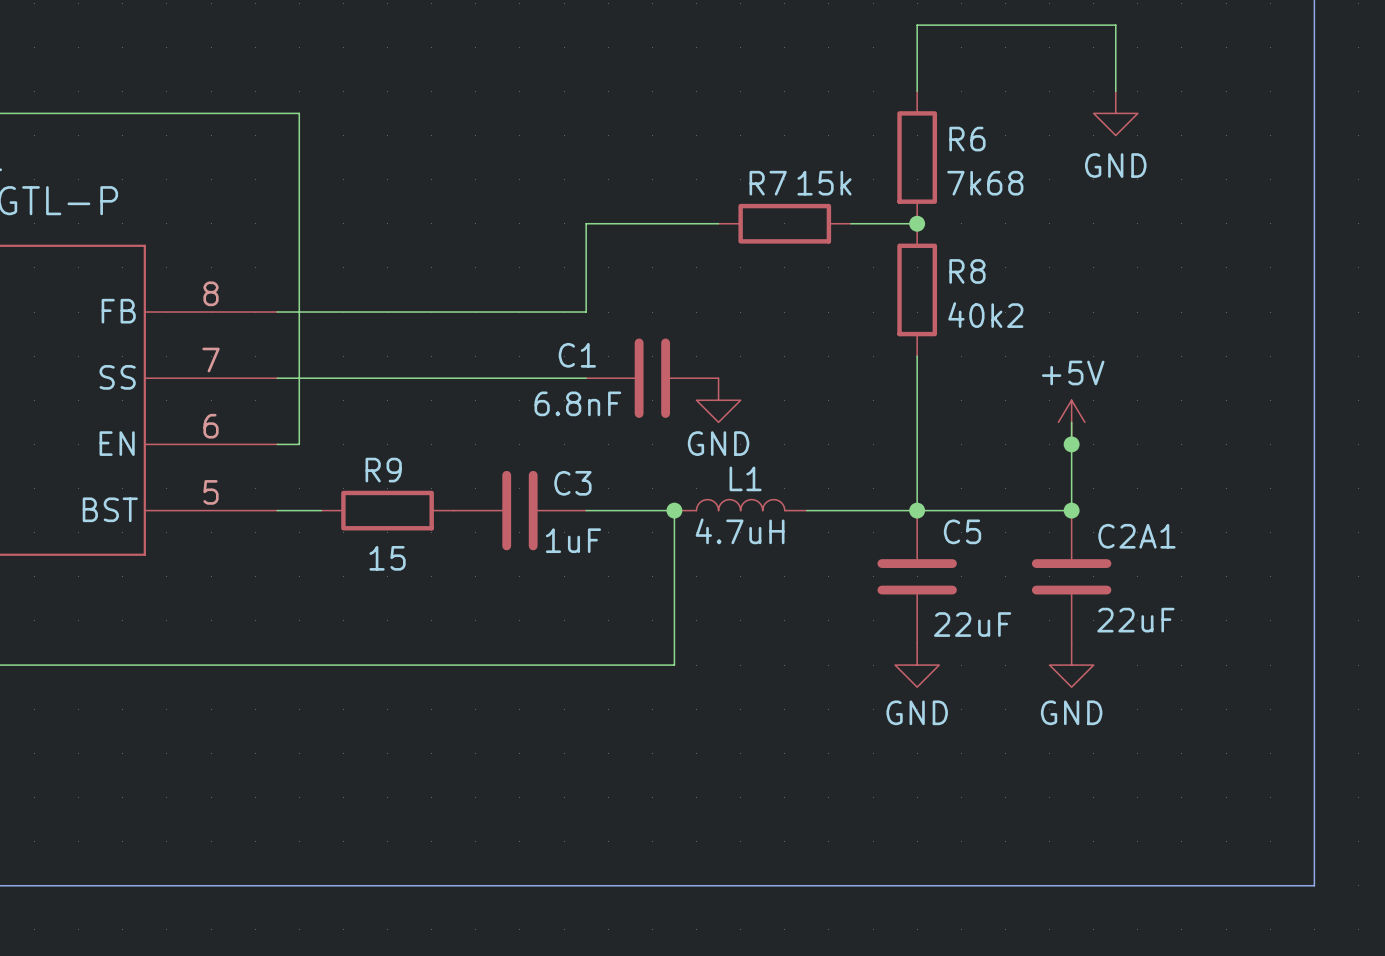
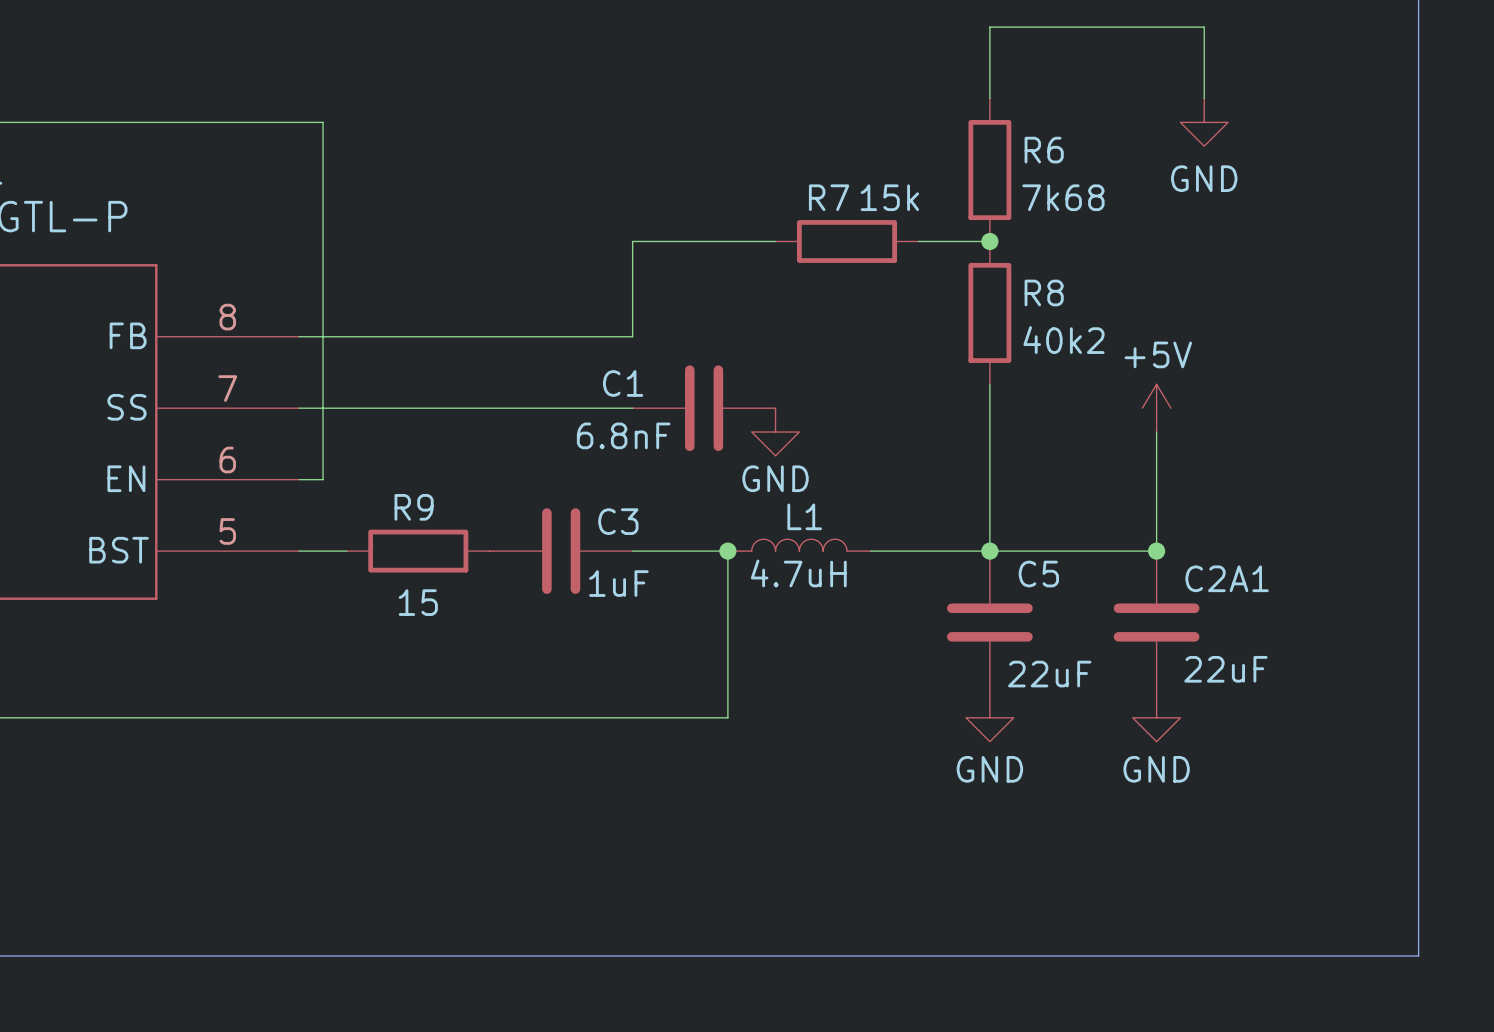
power symbol position: +5V (1071, 422) -> +5V (1156, 408)
junction: (1071, 444) -> none

